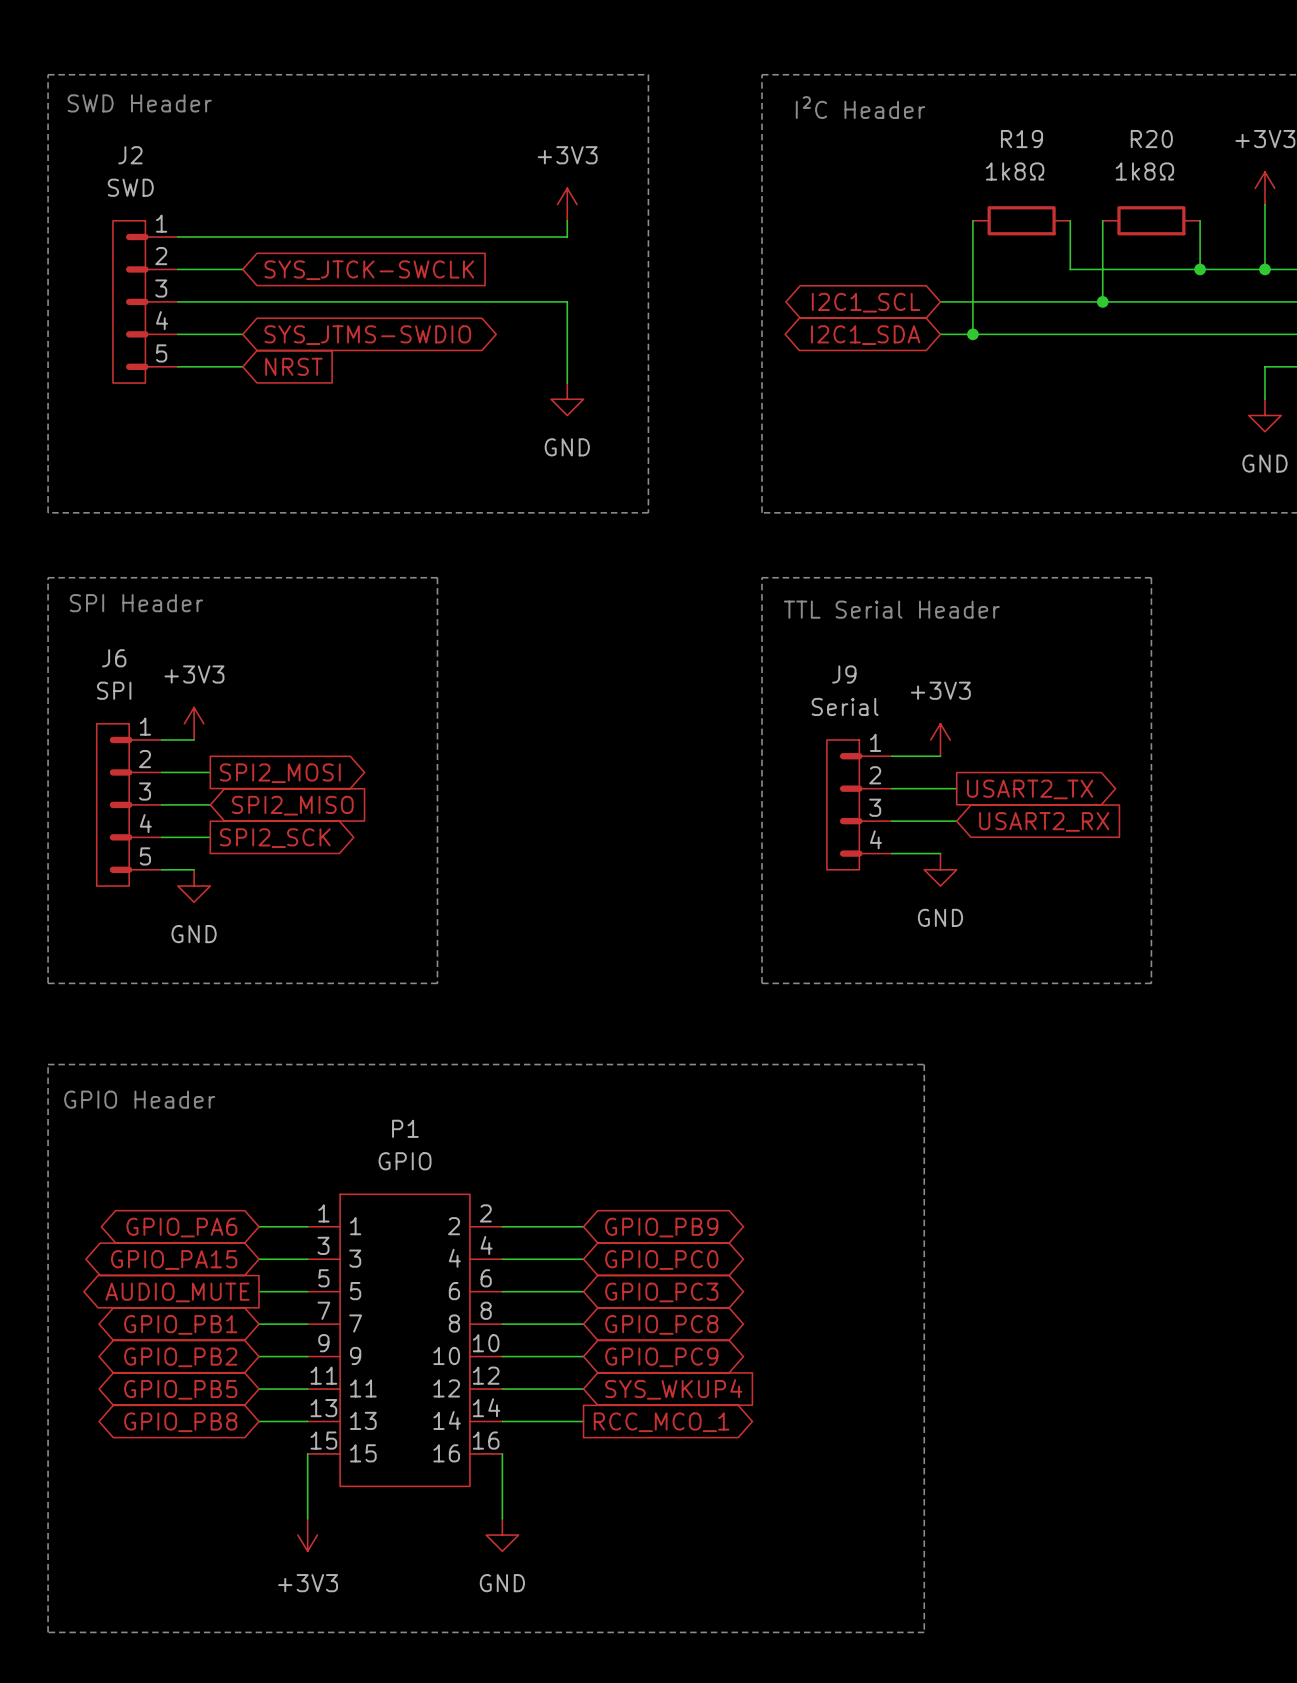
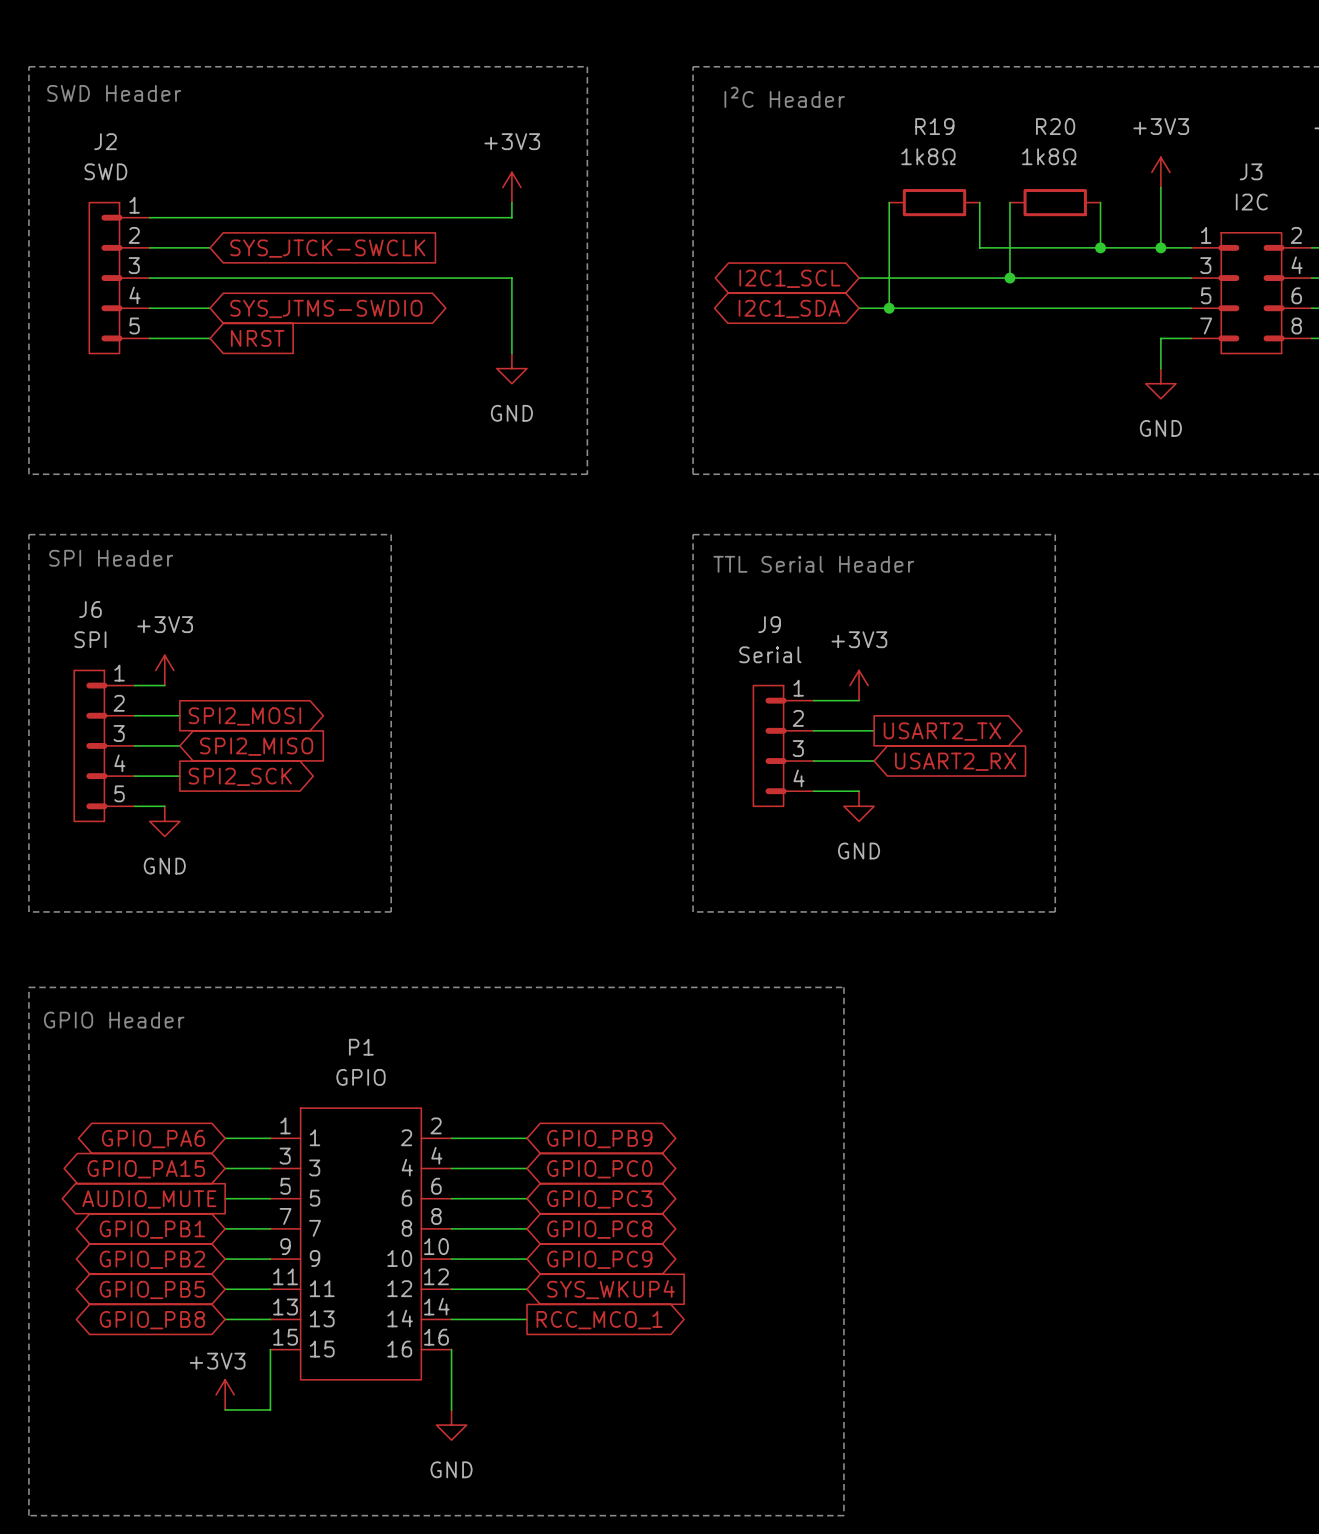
wire: none -> (225, 1410) (270, 1410)
power symbol rotation: 0° (307, 1535) -> 180° (225, 1394)
power symbol position: +3V3 (307, 1535) -> +3V3 (225, 1394)

